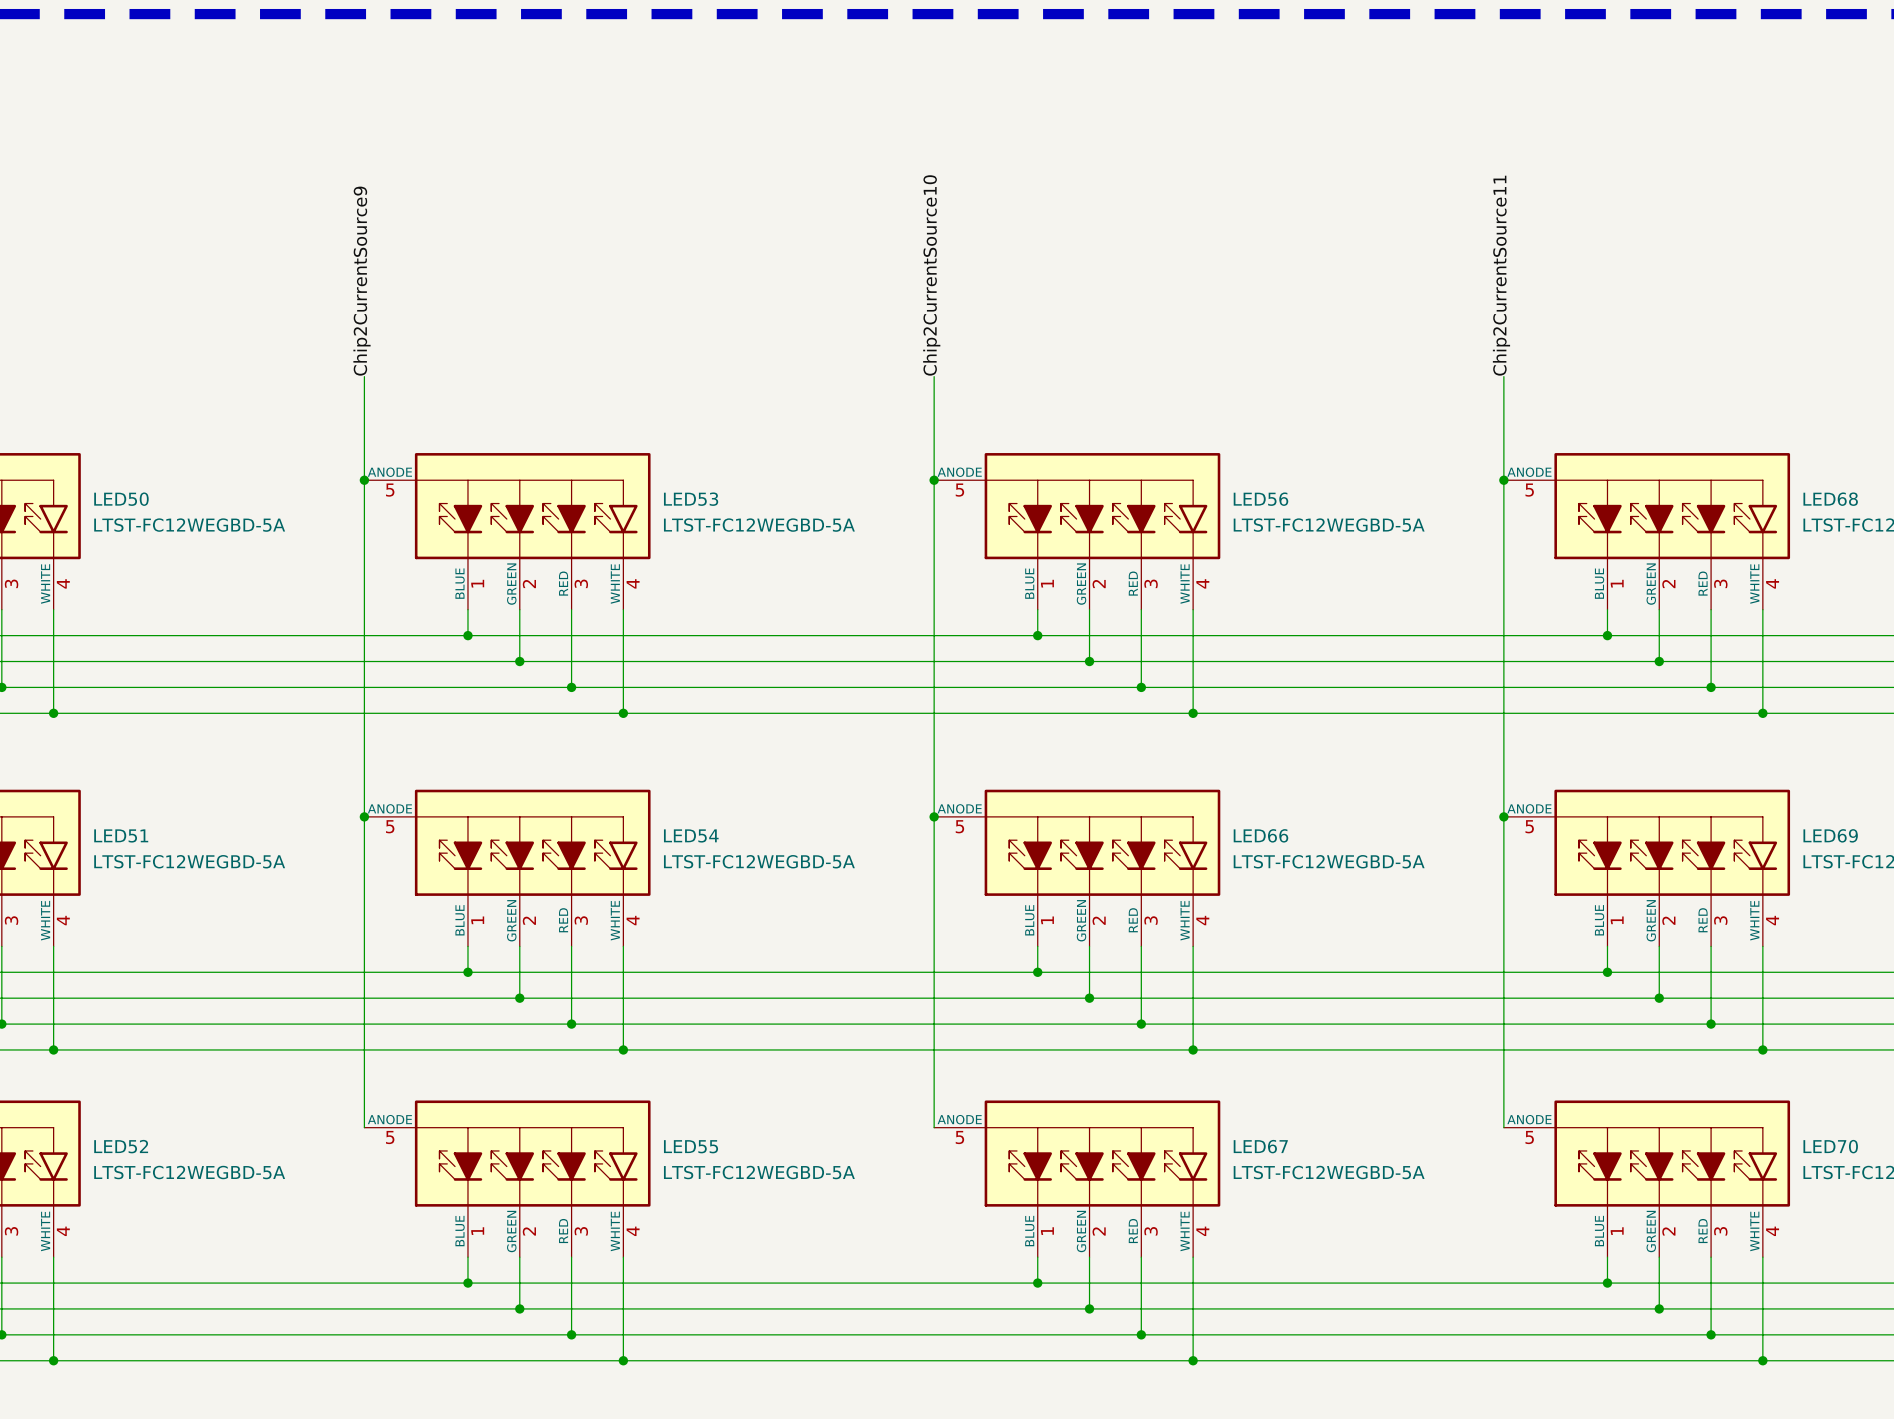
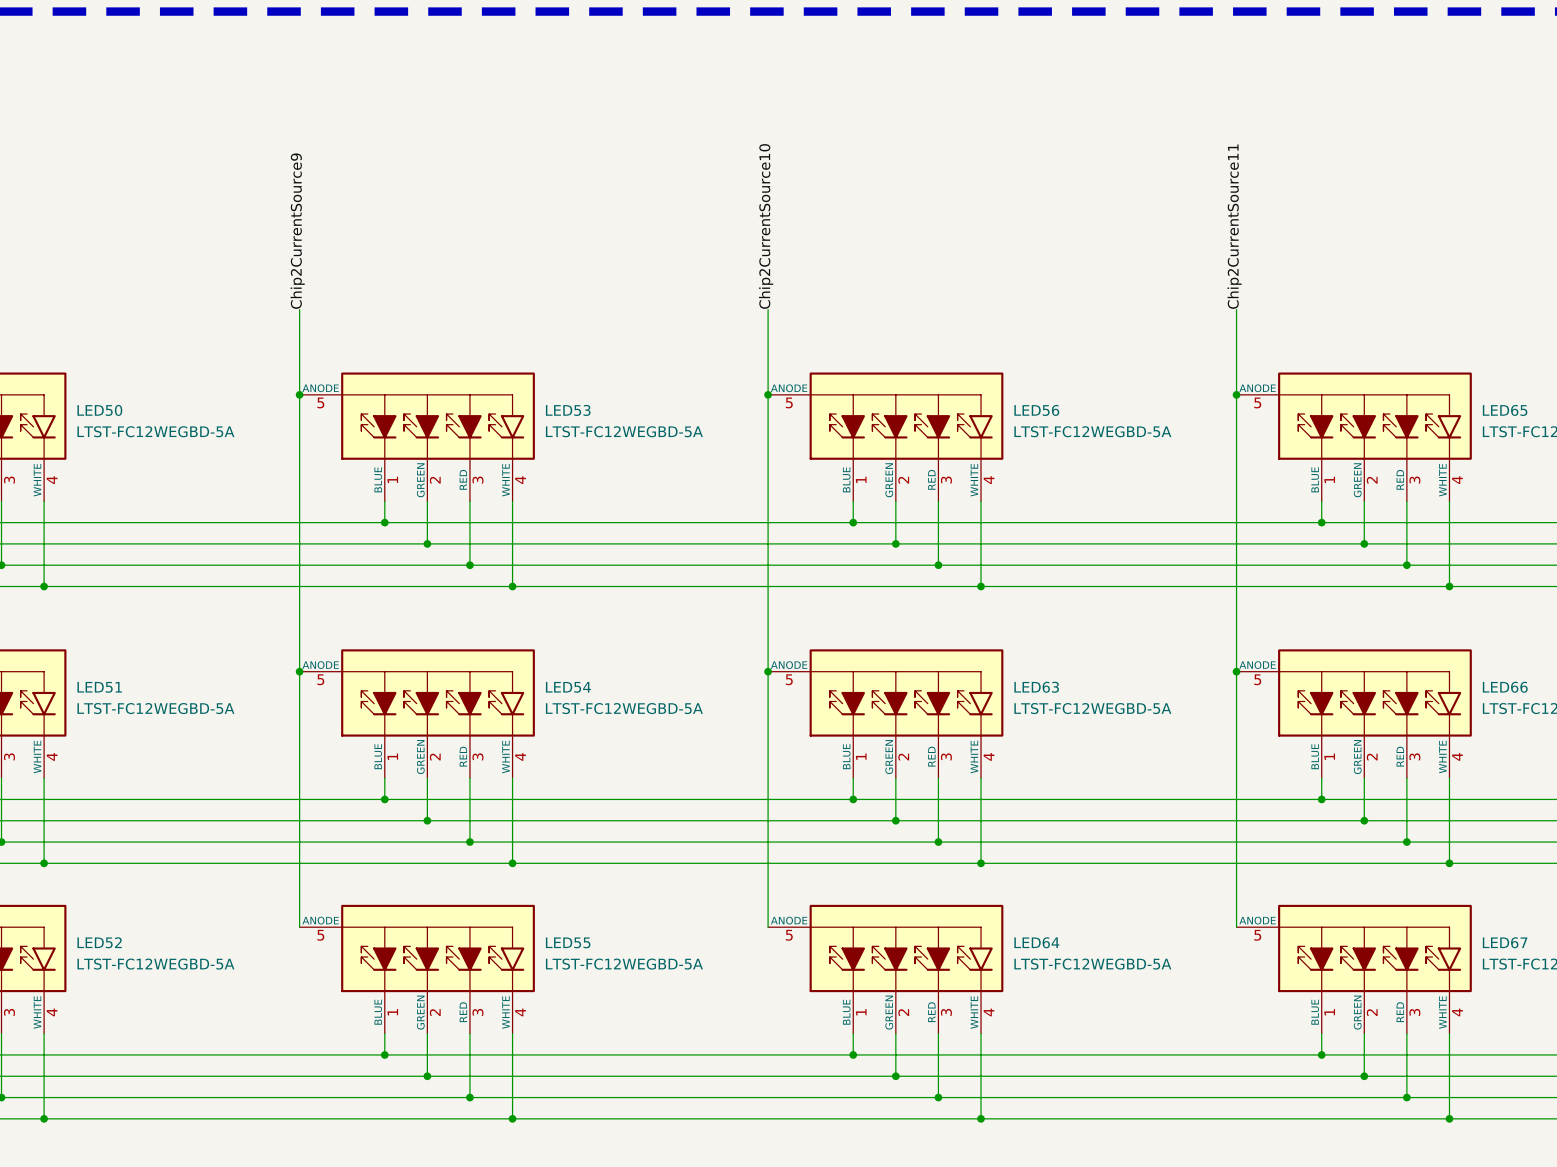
LED68 name: LED68 (1830, 499) -> LED65 (1505, 410)
LED66 name: LED66 (1260, 835) -> LED63 (1036, 687)
LED69 name: LED69 (1830, 835) -> LED66 (1505, 687)
LED67 name: LED67 (1260, 1146) -> LED64 (1036, 942)
LED70 name: LED70 (1830, 1146) -> LED67 (1505, 942)

